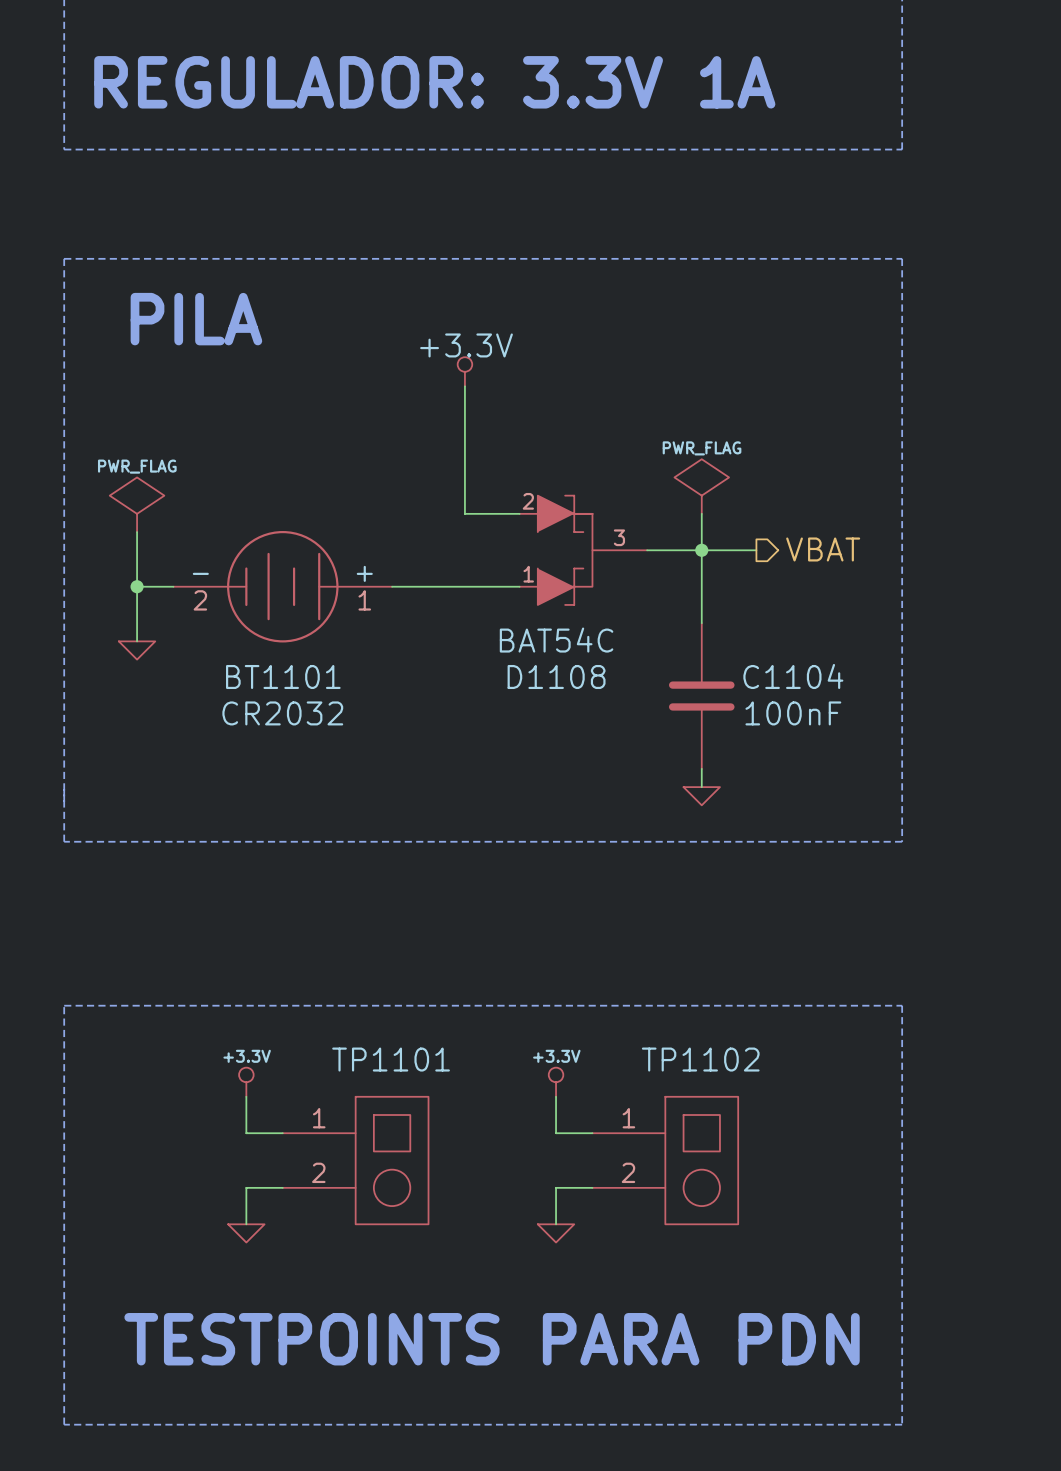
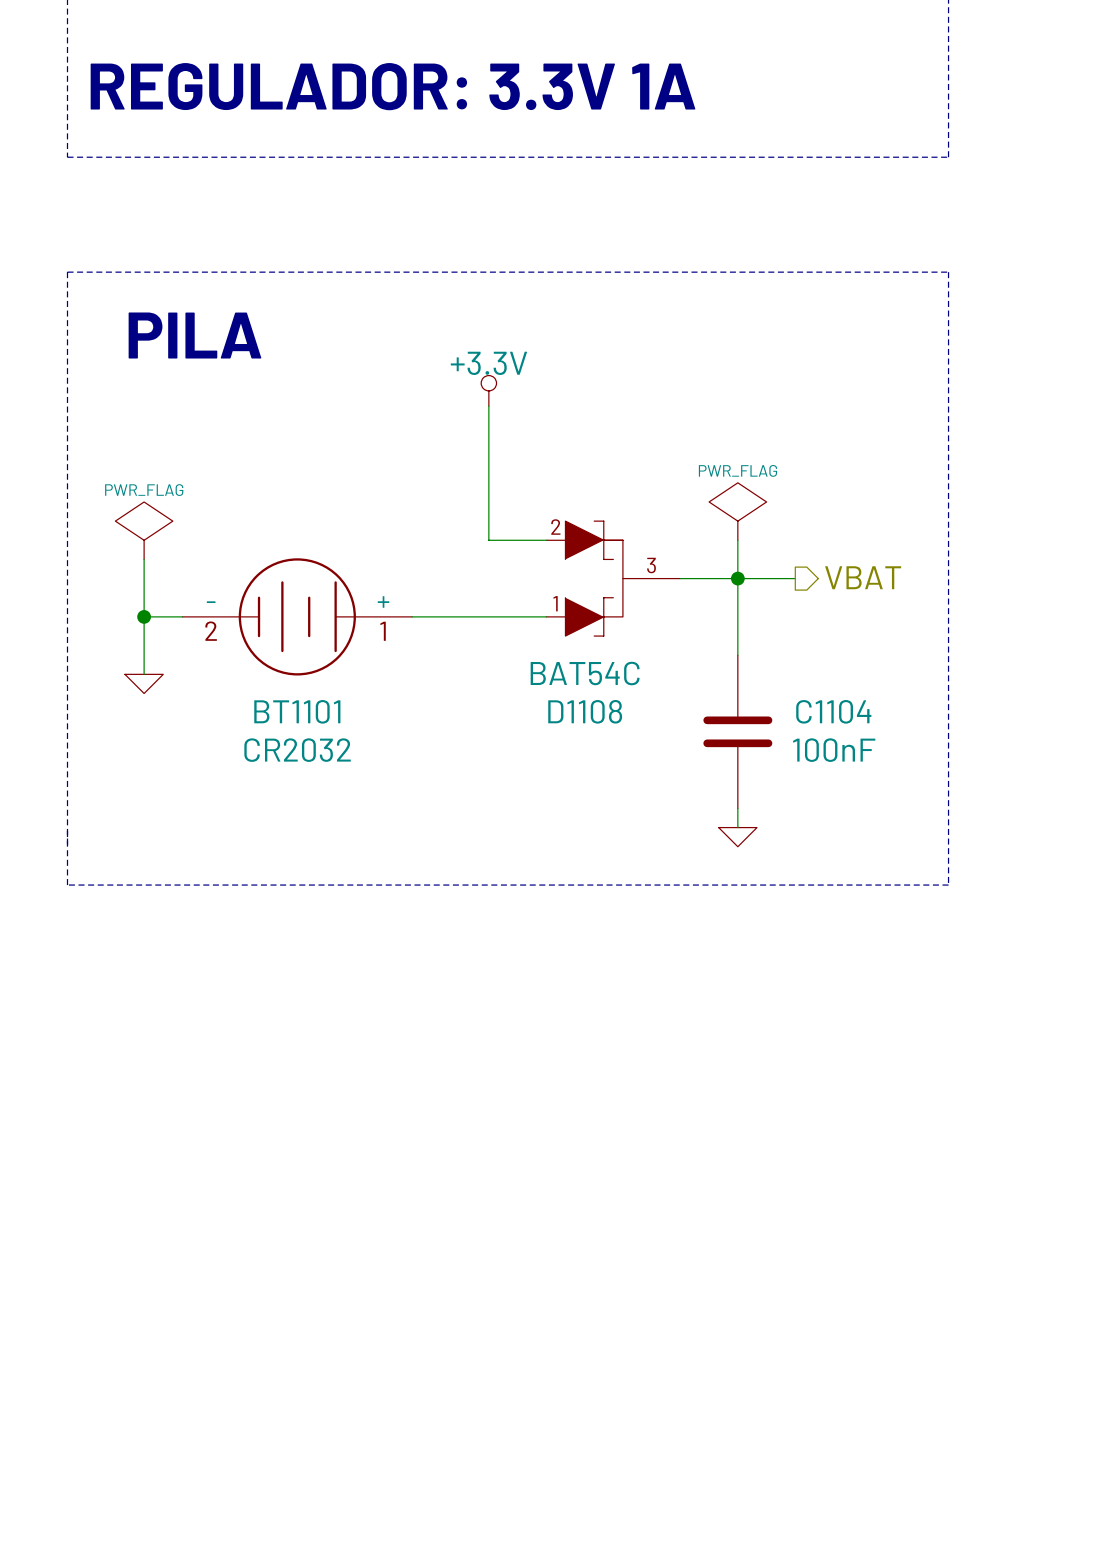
line: (64, 1005) (902, 1005) (902, 1424) (64, 1424) (64, 1005) -> none
power symbol: +3.3V (246, 1082) -> none
power symbol: +3.3V (556, 1082) -> none
wire: (246, 1096) (246, 1133) (282, 1133) -> none
wire: (556, 1096) (556, 1133) (592, 1133) -> none
TP1101: (355, 1160) -> none
TP1102: (665, 1160) -> none
wire: (282, 1187) (246, 1187) (246, 1224) -> none
wire: (592, 1187) (556, 1187) (556, 1224) -> none
power symbol: (246, 1233) -> none
power symbol: (556, 1233) -> none
text: TESTPOINTS PARA PDN (492, 1339) -> none

